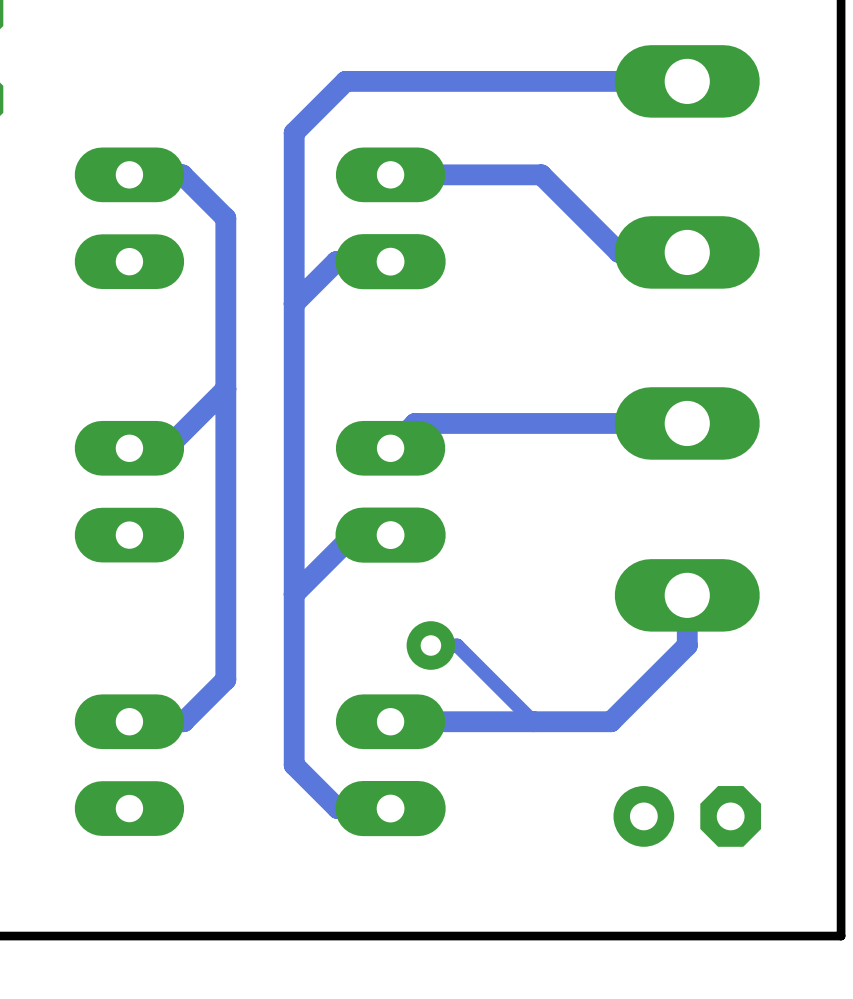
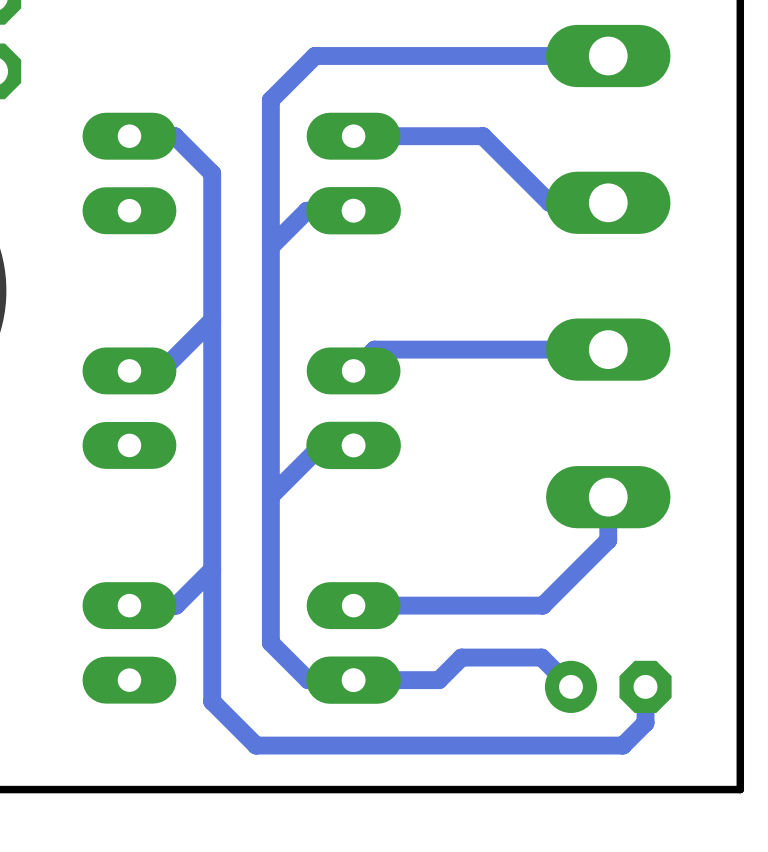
track: (430, 645) (457, 645) (533, 721) -> none
via: (430, 645) -> none
track: none -> (212, 569) (212, 701) (256, 745) (622, 745) (645, 722) (645, 686)
track: none -> (353, 680) (438, 680) (461, 657) (541, 657) (571, 686)

